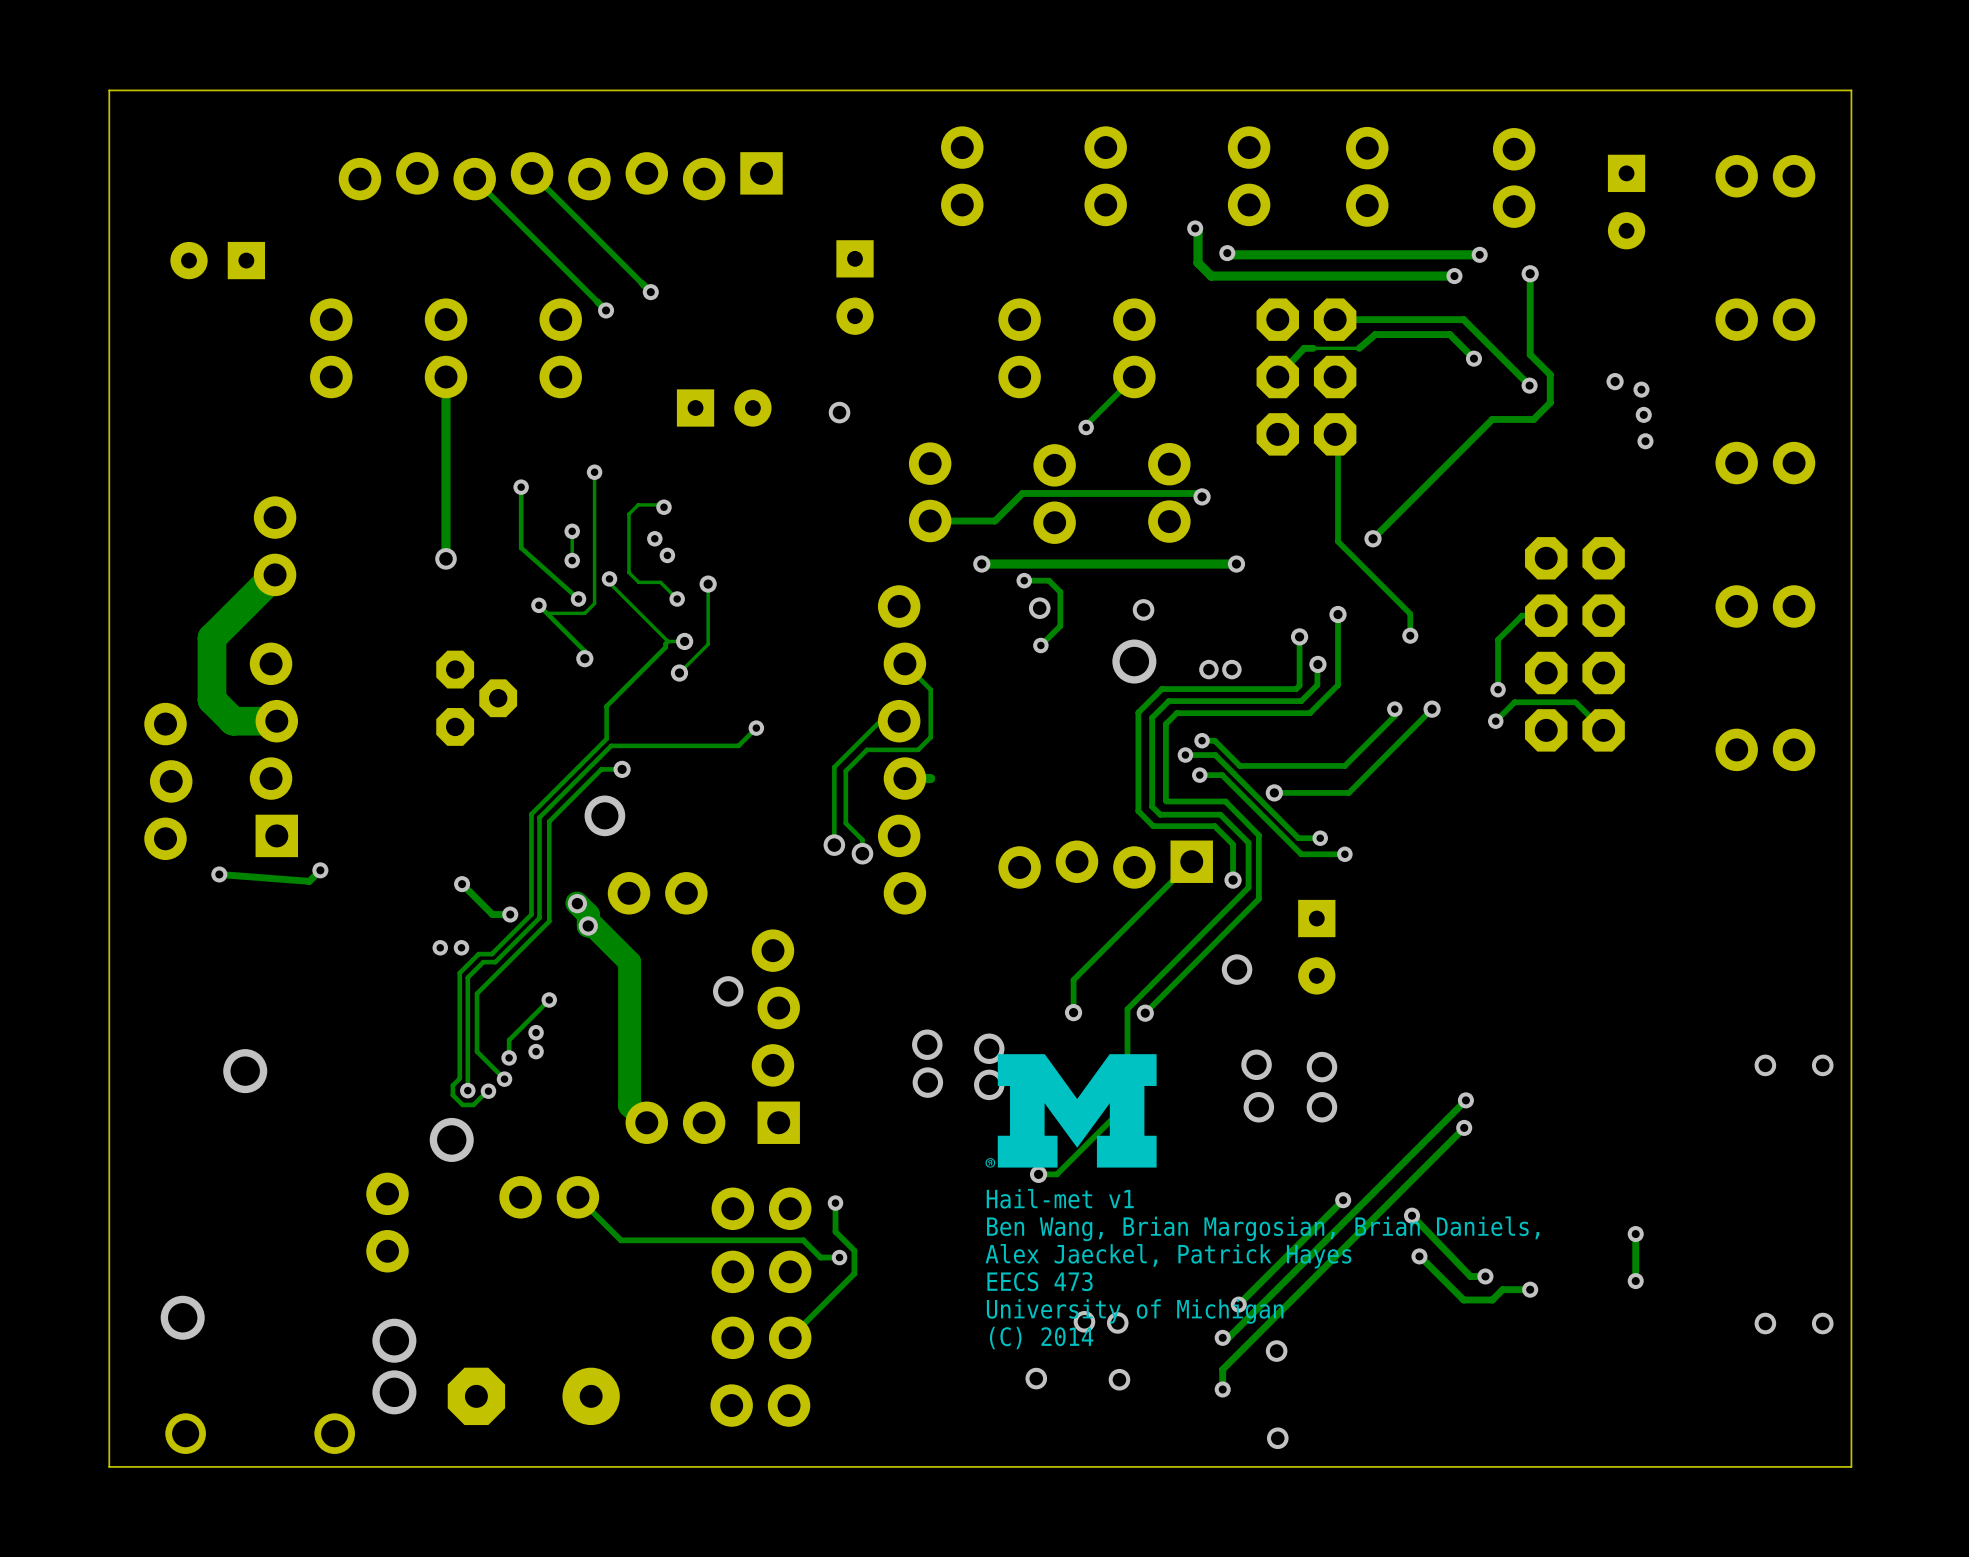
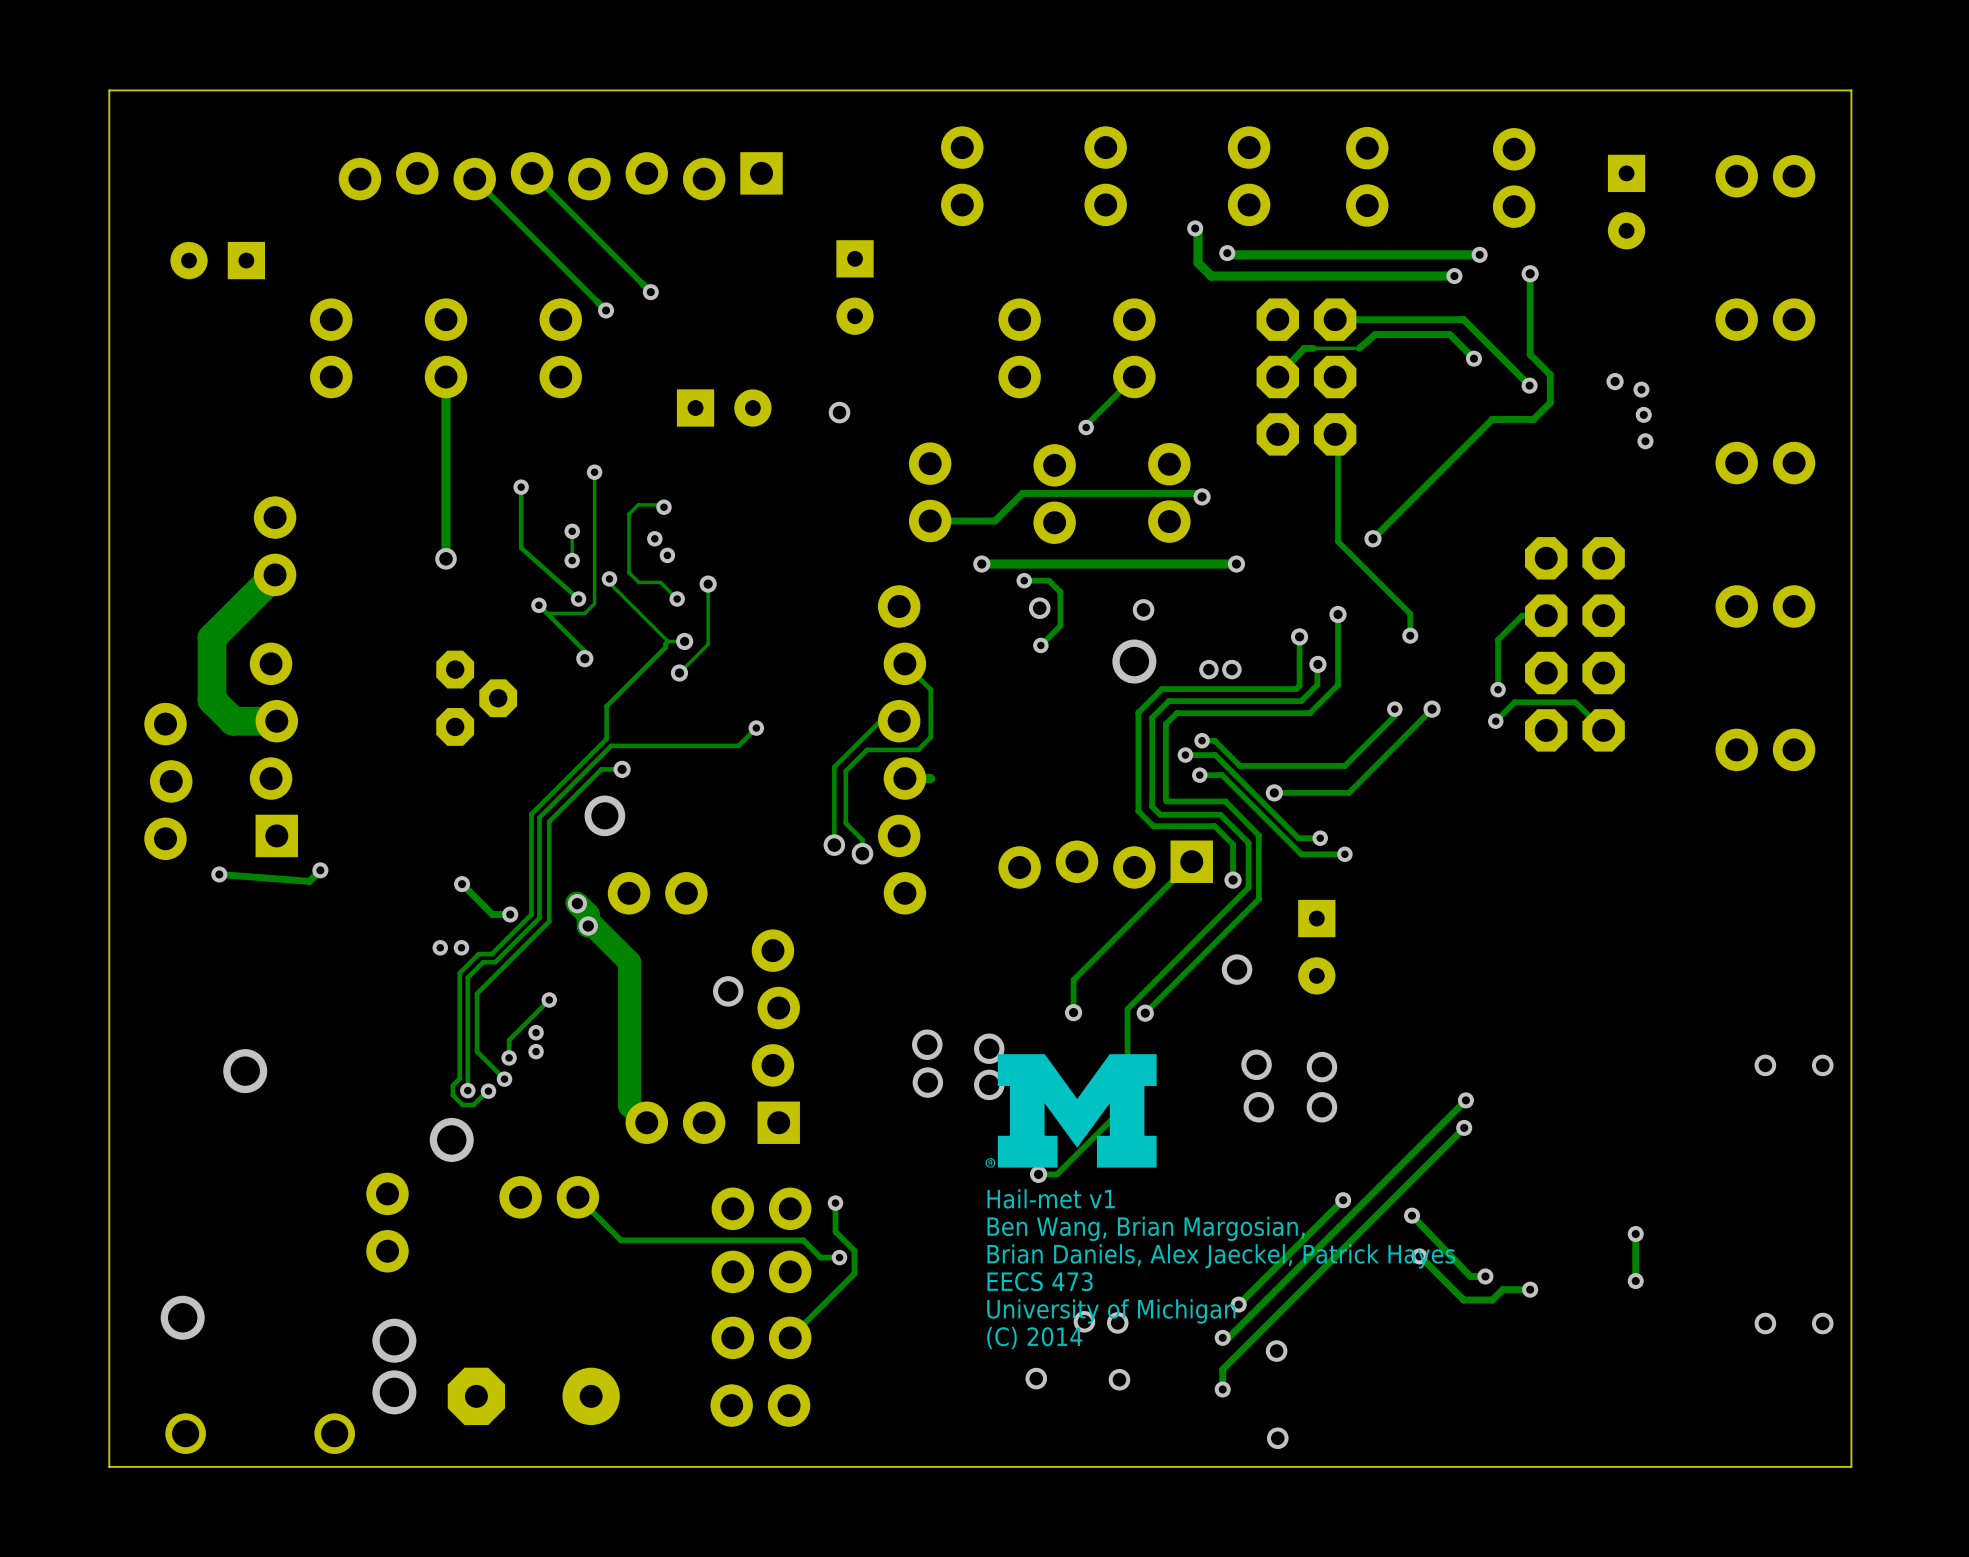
text: Ben Wang, Brian Margosian, Brian Daniels, (1263, 1228) -> Ben Wang, Brian Margosian, (1146, 1228)
text: Alex Jaeckel, Patrick Hayes (1168, 1256) -> Brian Daniels, Alex Jaeckel, Patrick Hayes (1221, 1256)

